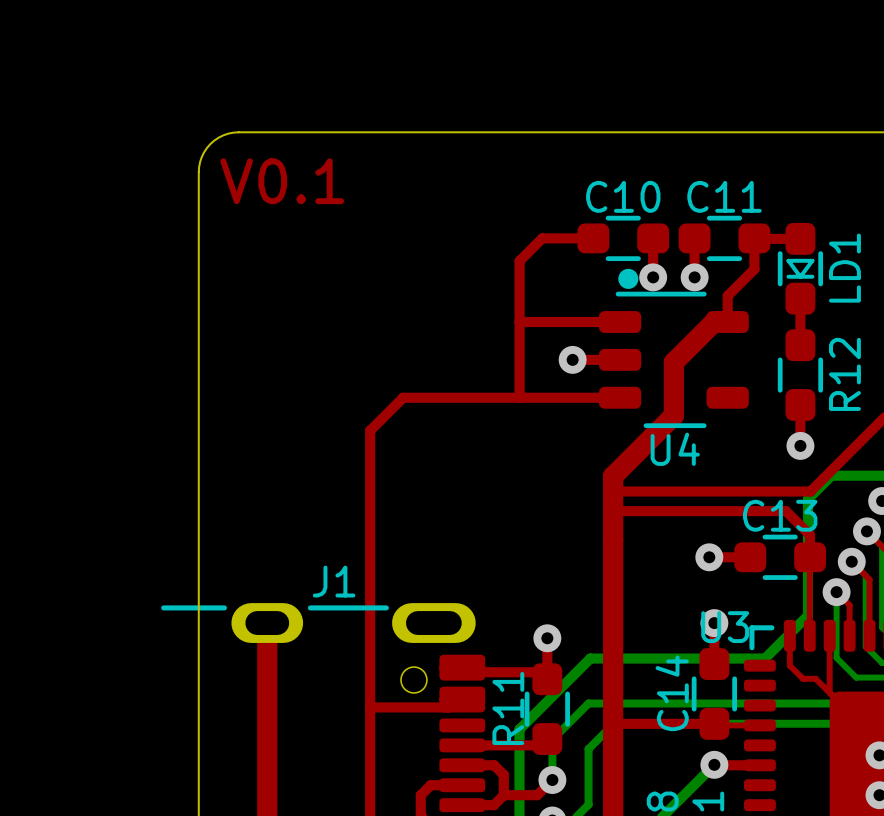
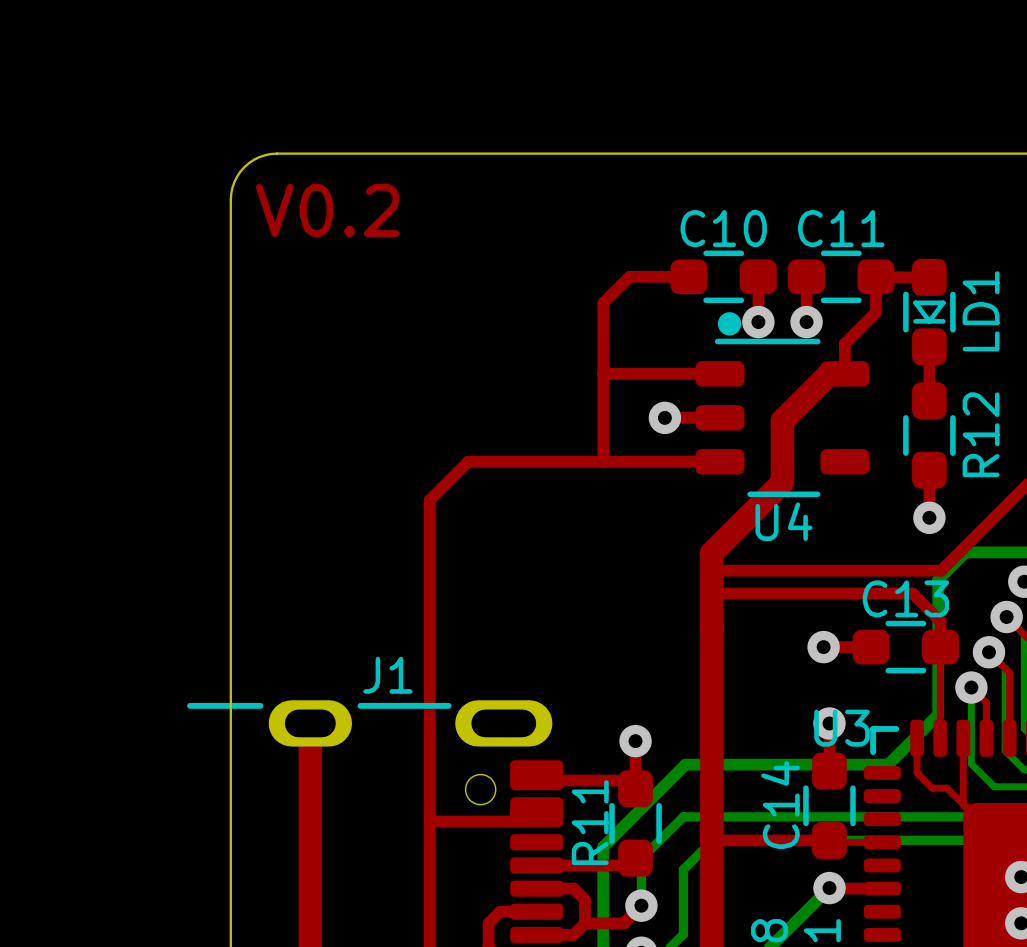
text: V0.1 (282, 181) -> V0.2 (327, 210)

